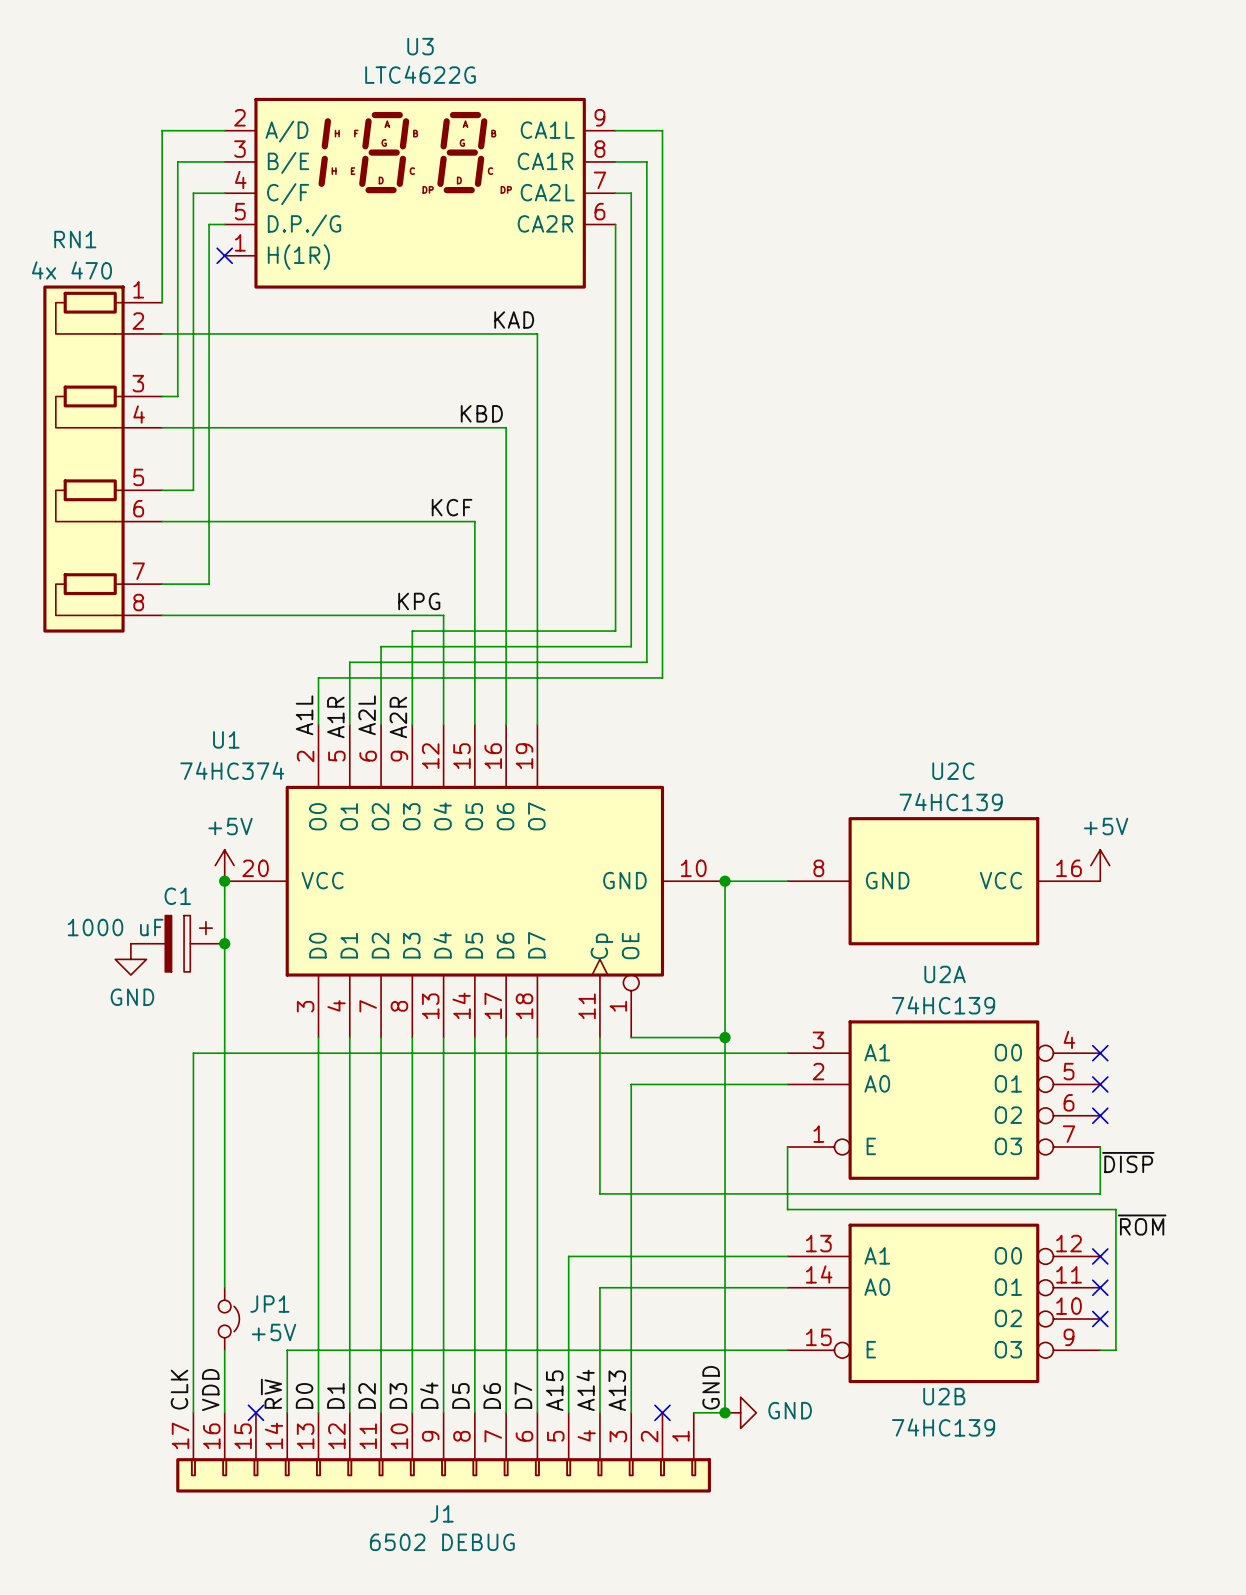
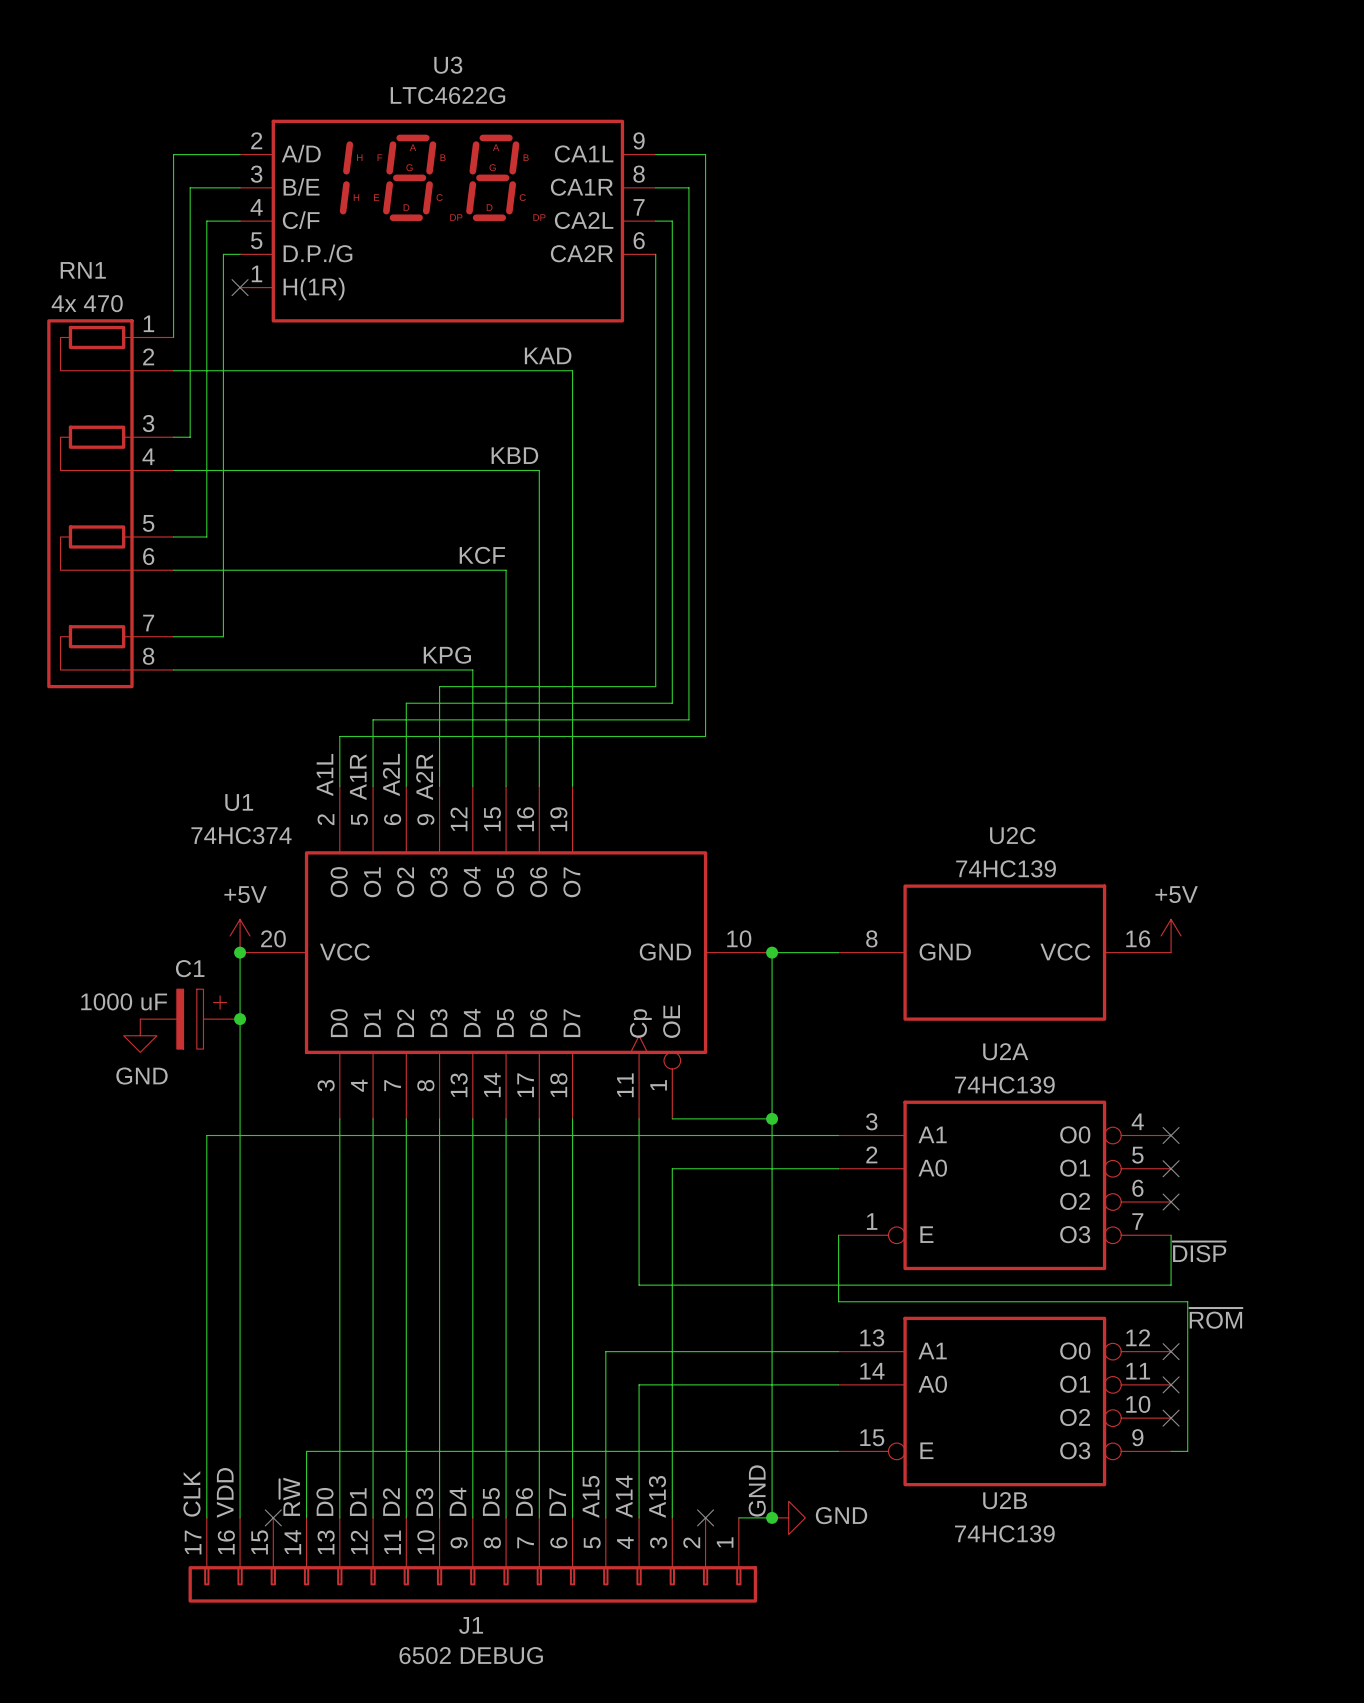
wire: none -> (240, 1384) (240, 1451)
JP1: +5V (228, 1319) -> none

